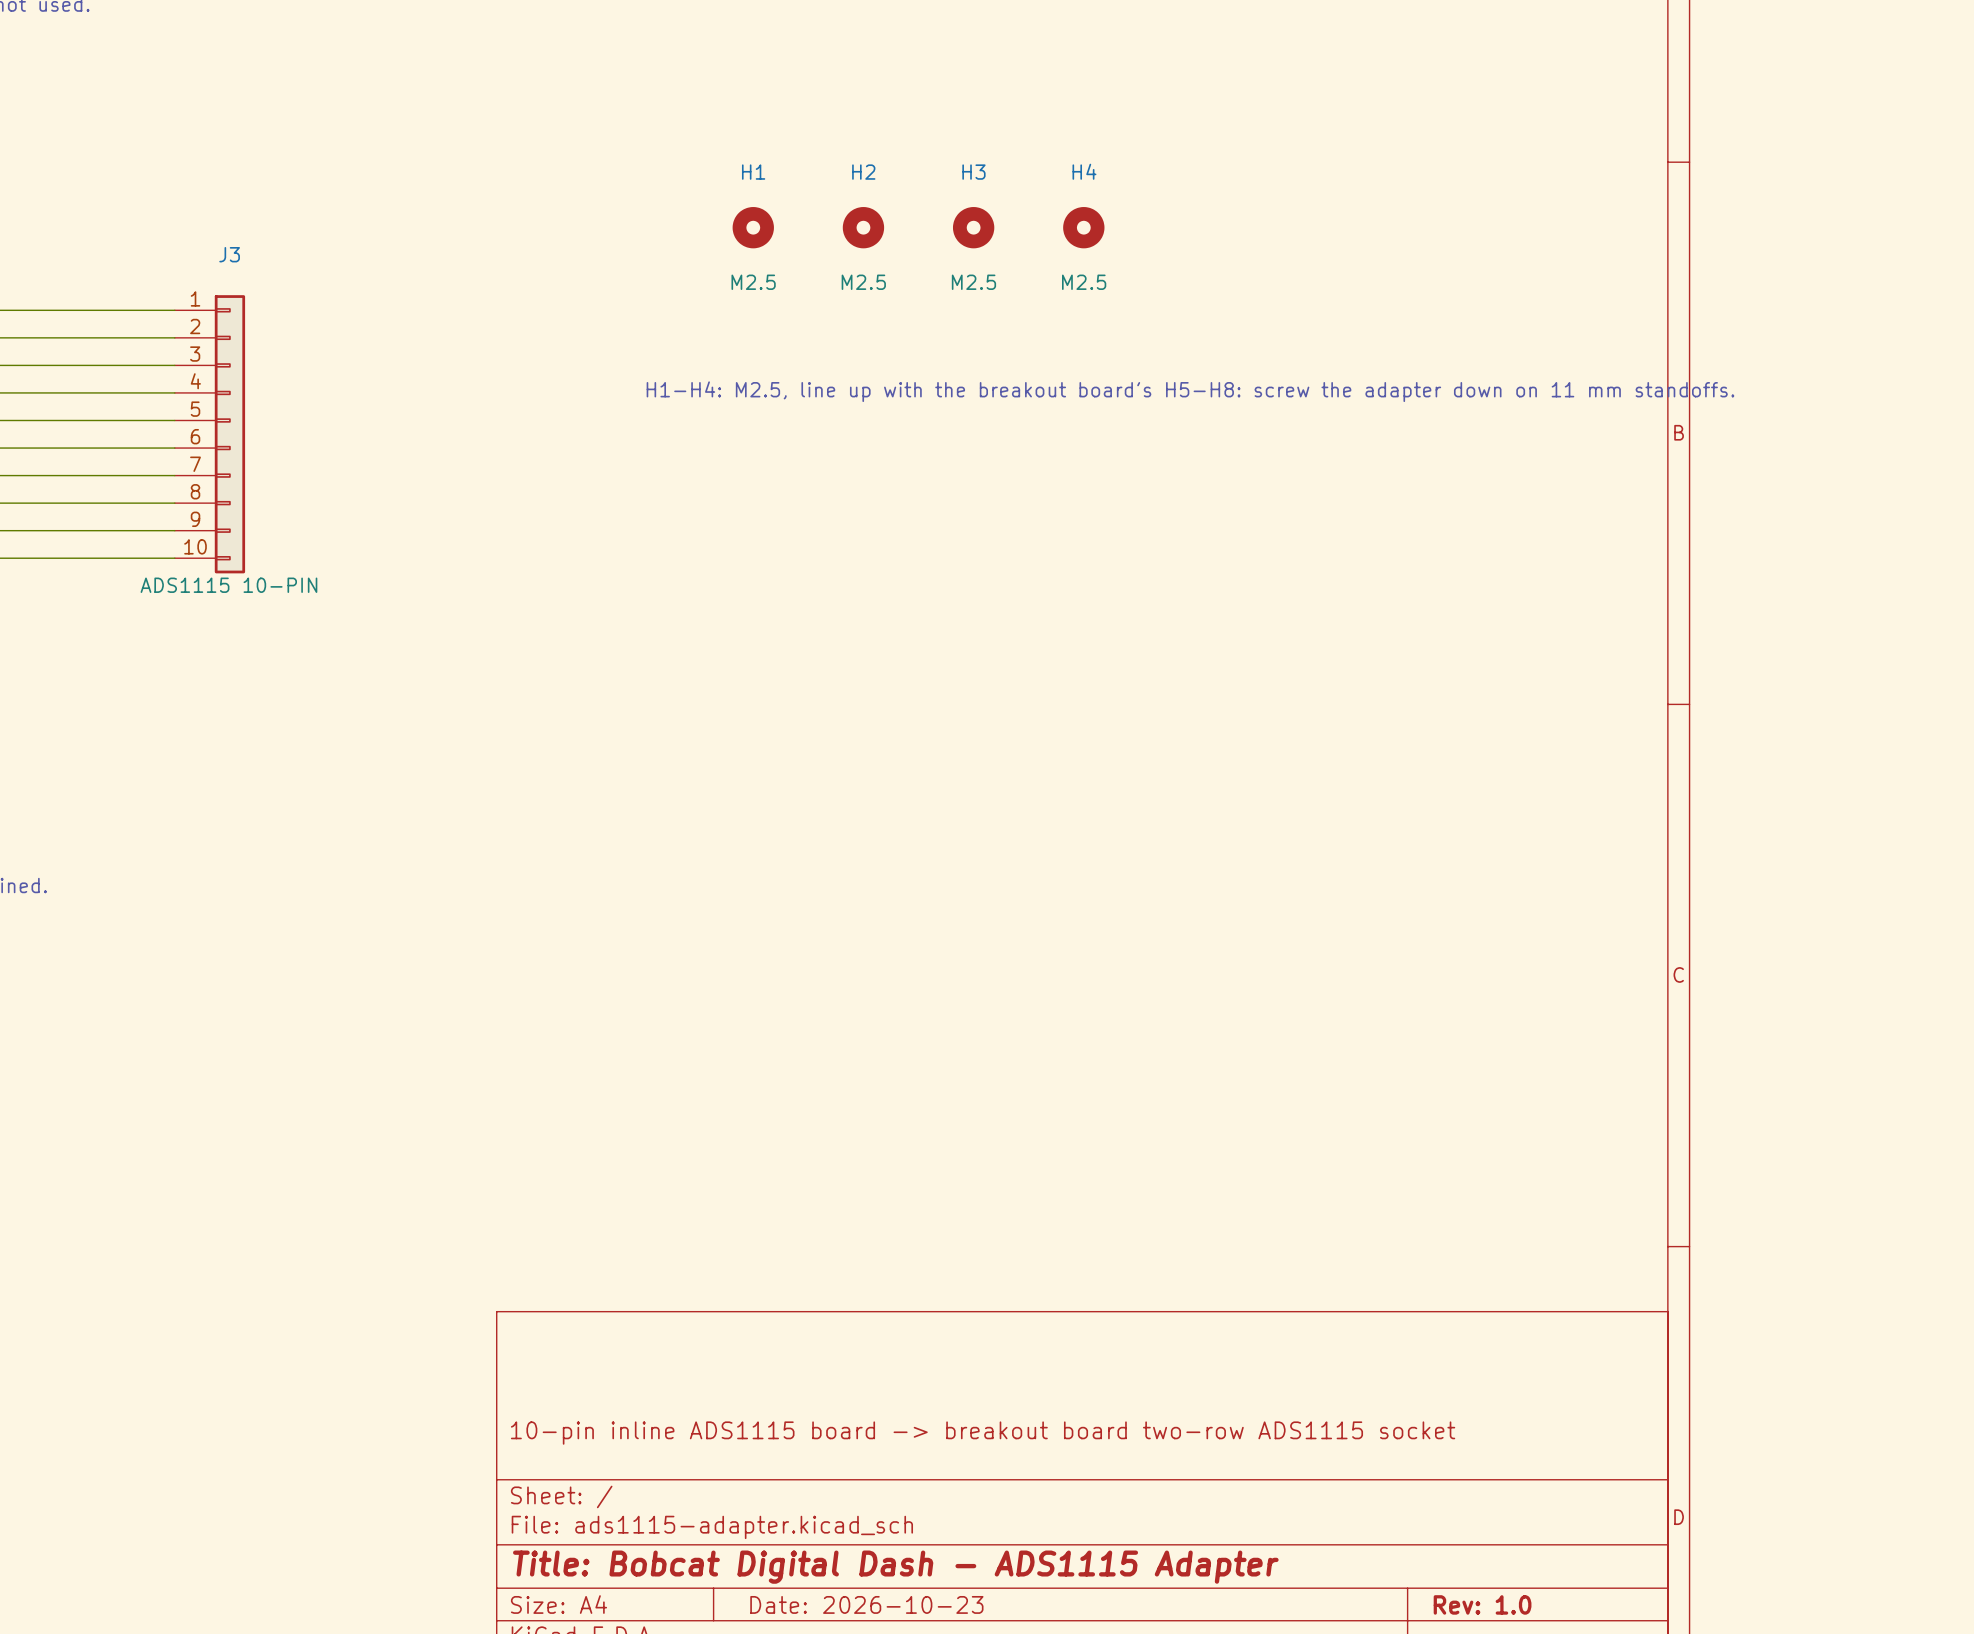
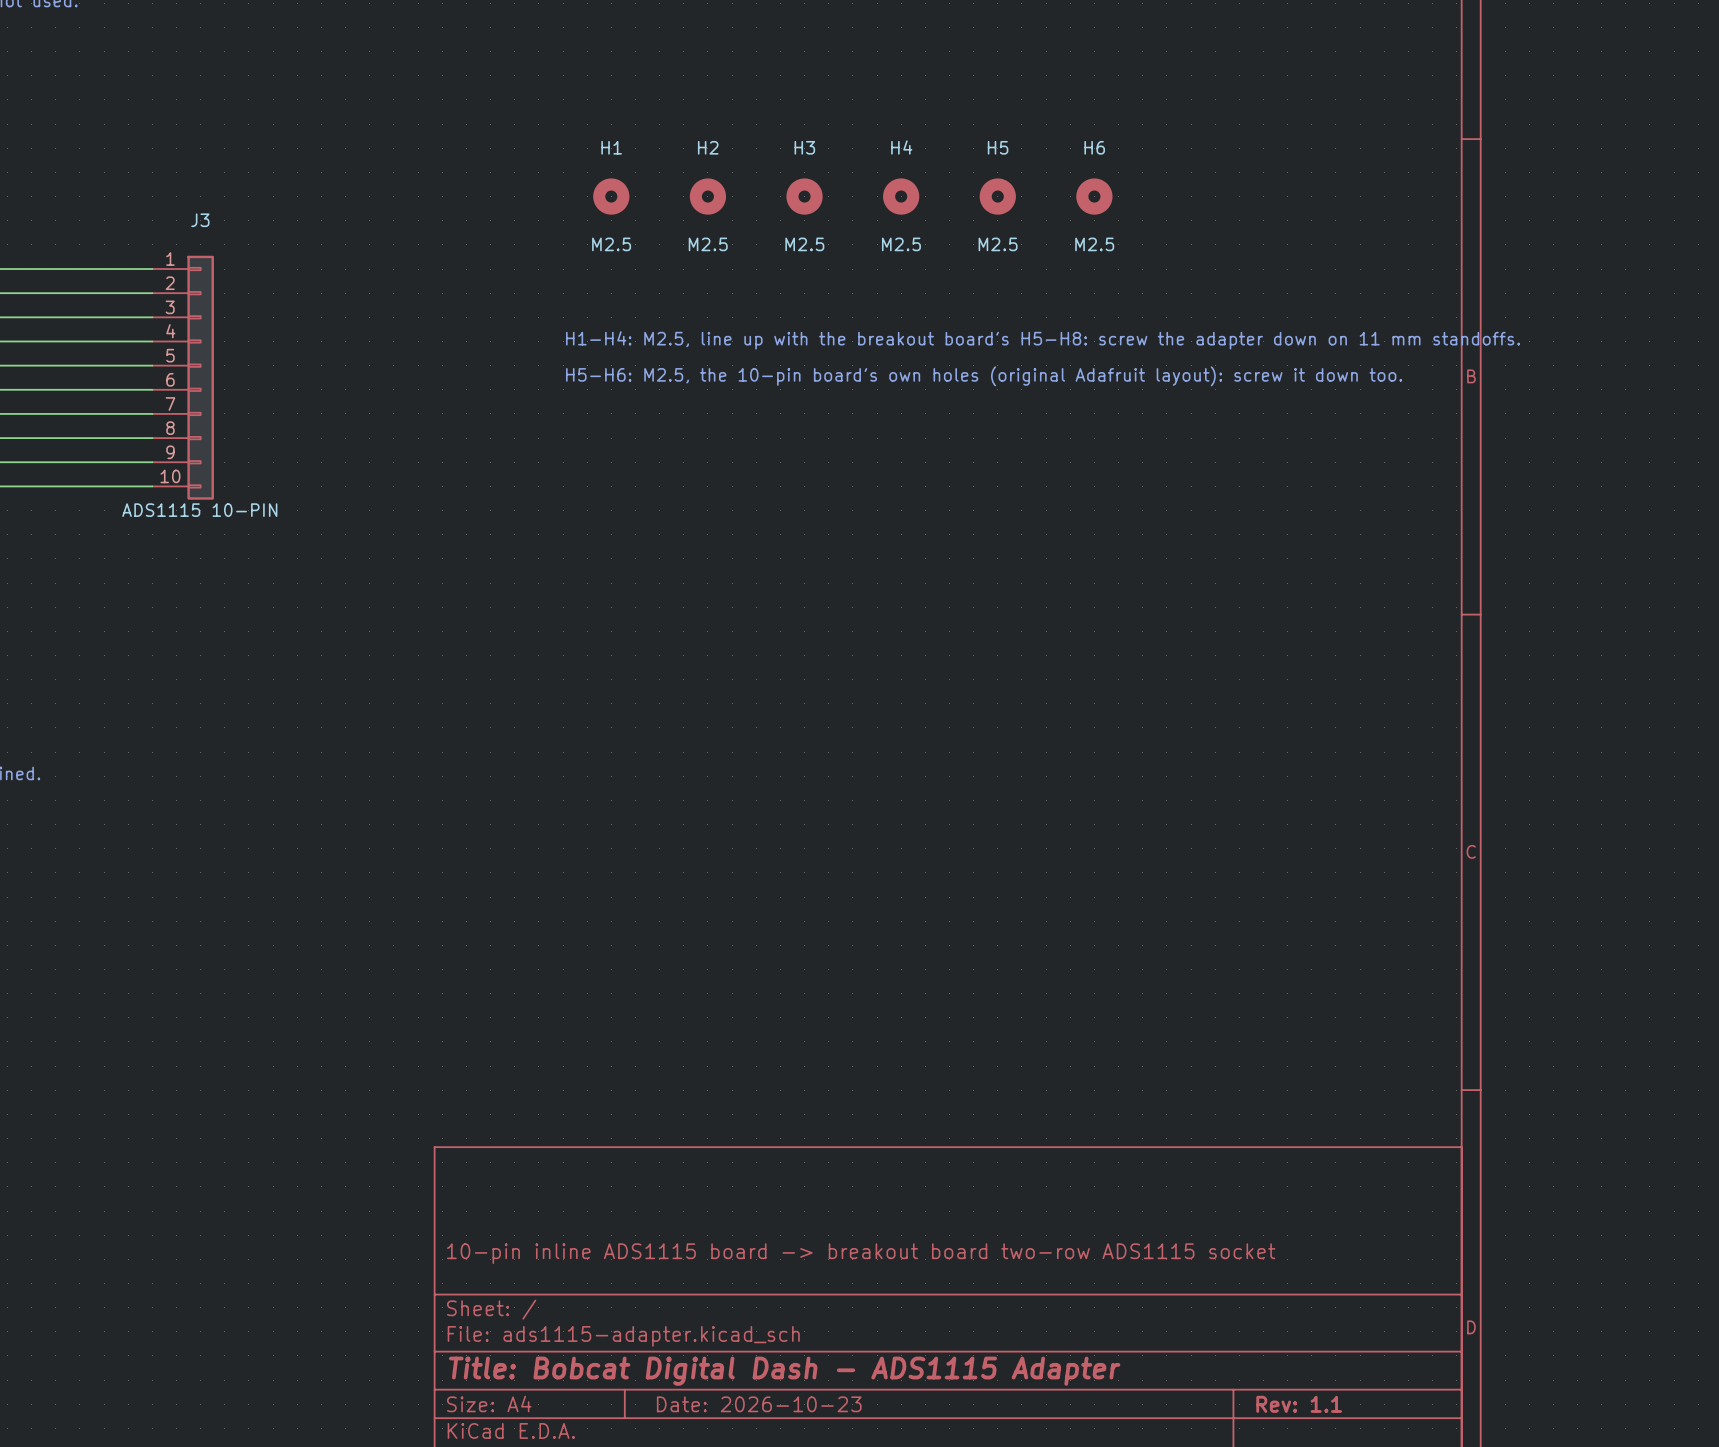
H1 position: (753, 227) -> (611, 196)
H2 position: (863, 227) -> (707, 196)
H3 position: (973, 227) -> (804, 196)
H4 position: (1083, 227) -> (901, 196)
H5: none -> M2.5 (997, 196)
H6: none -> M2.5 (1094, 196)
text: none -> H5-H6: M2.5, the 10-pin board's own holes (original Adafruit layout): screw it down too. (984, 376)
title block: Rev: 1.0 (1482, 1604) -> Rev: 1.1 (1299, 1404)

